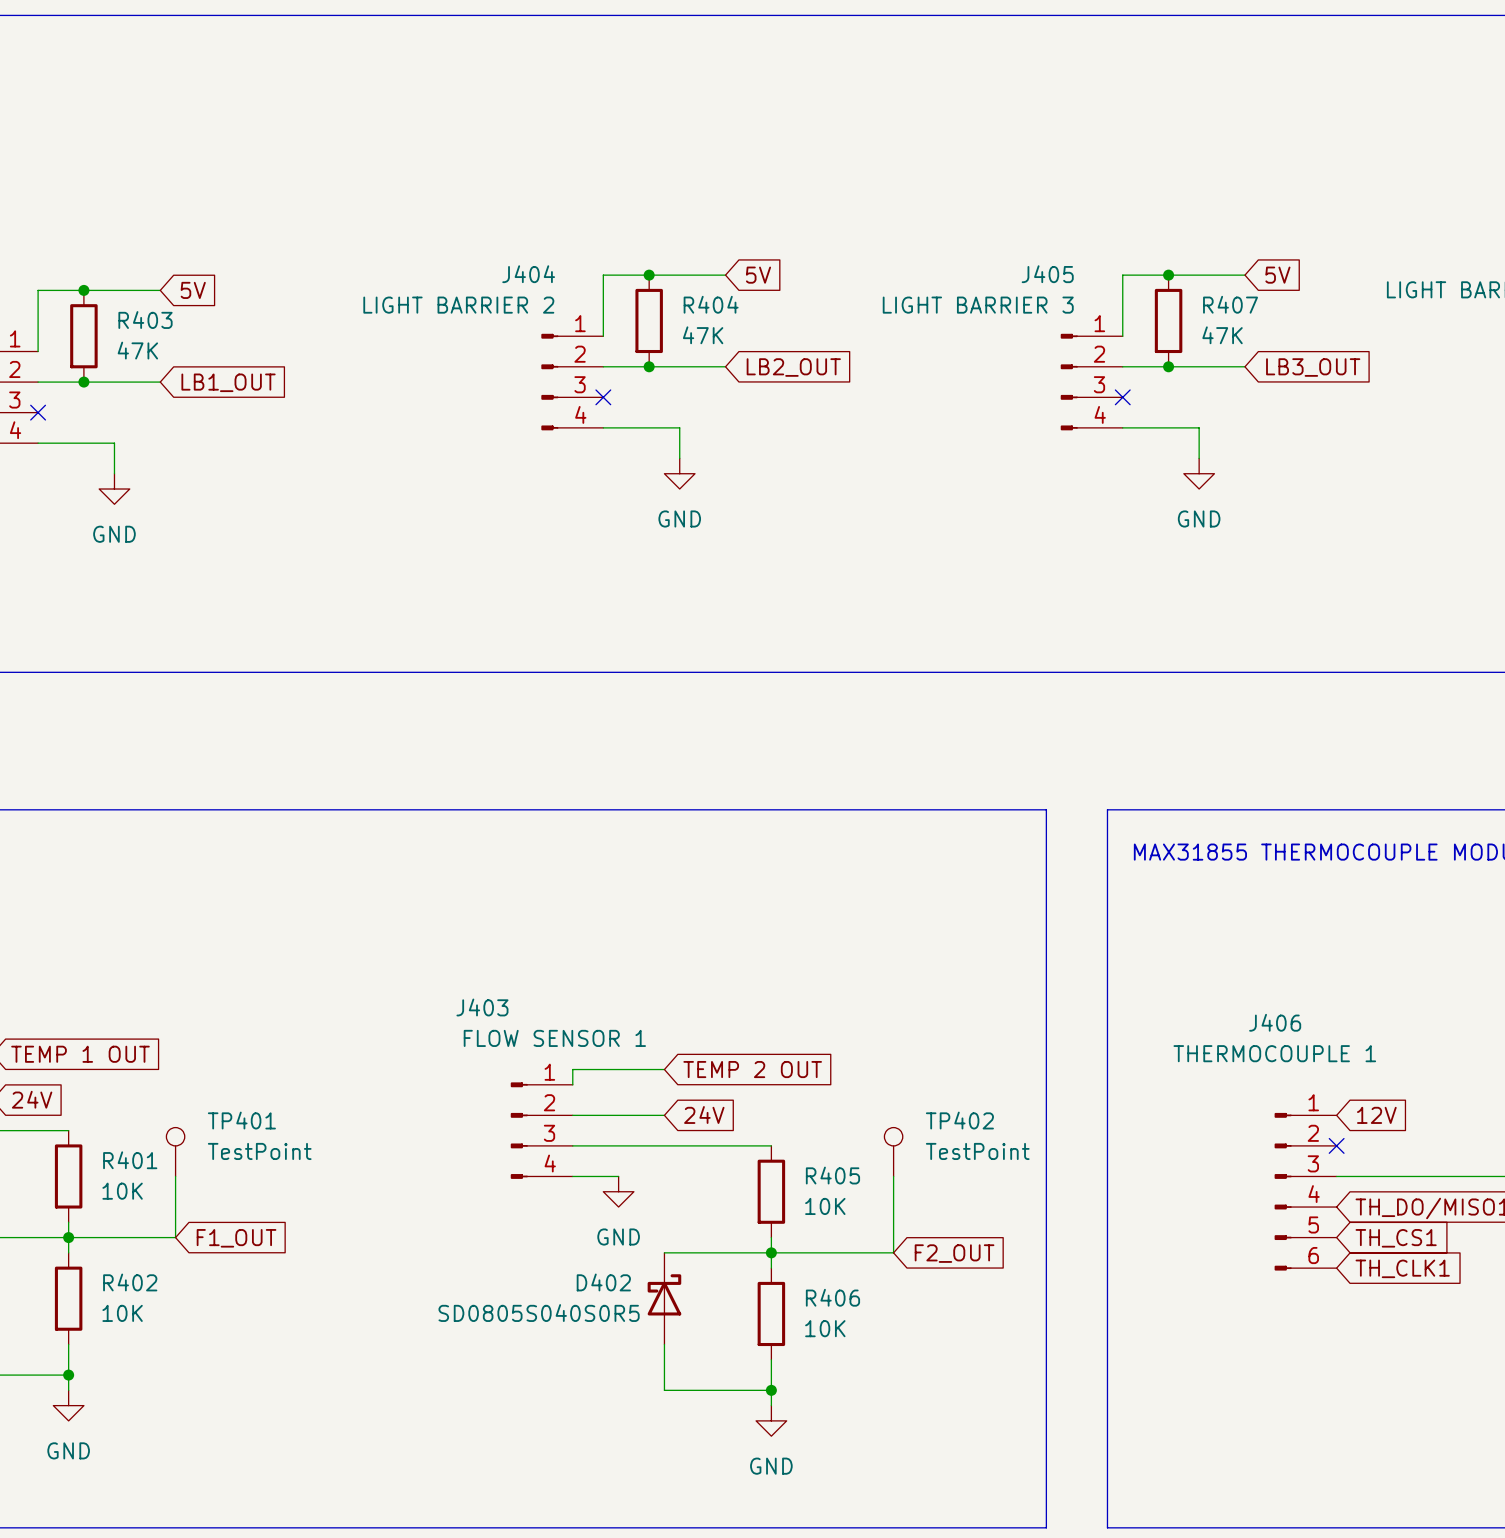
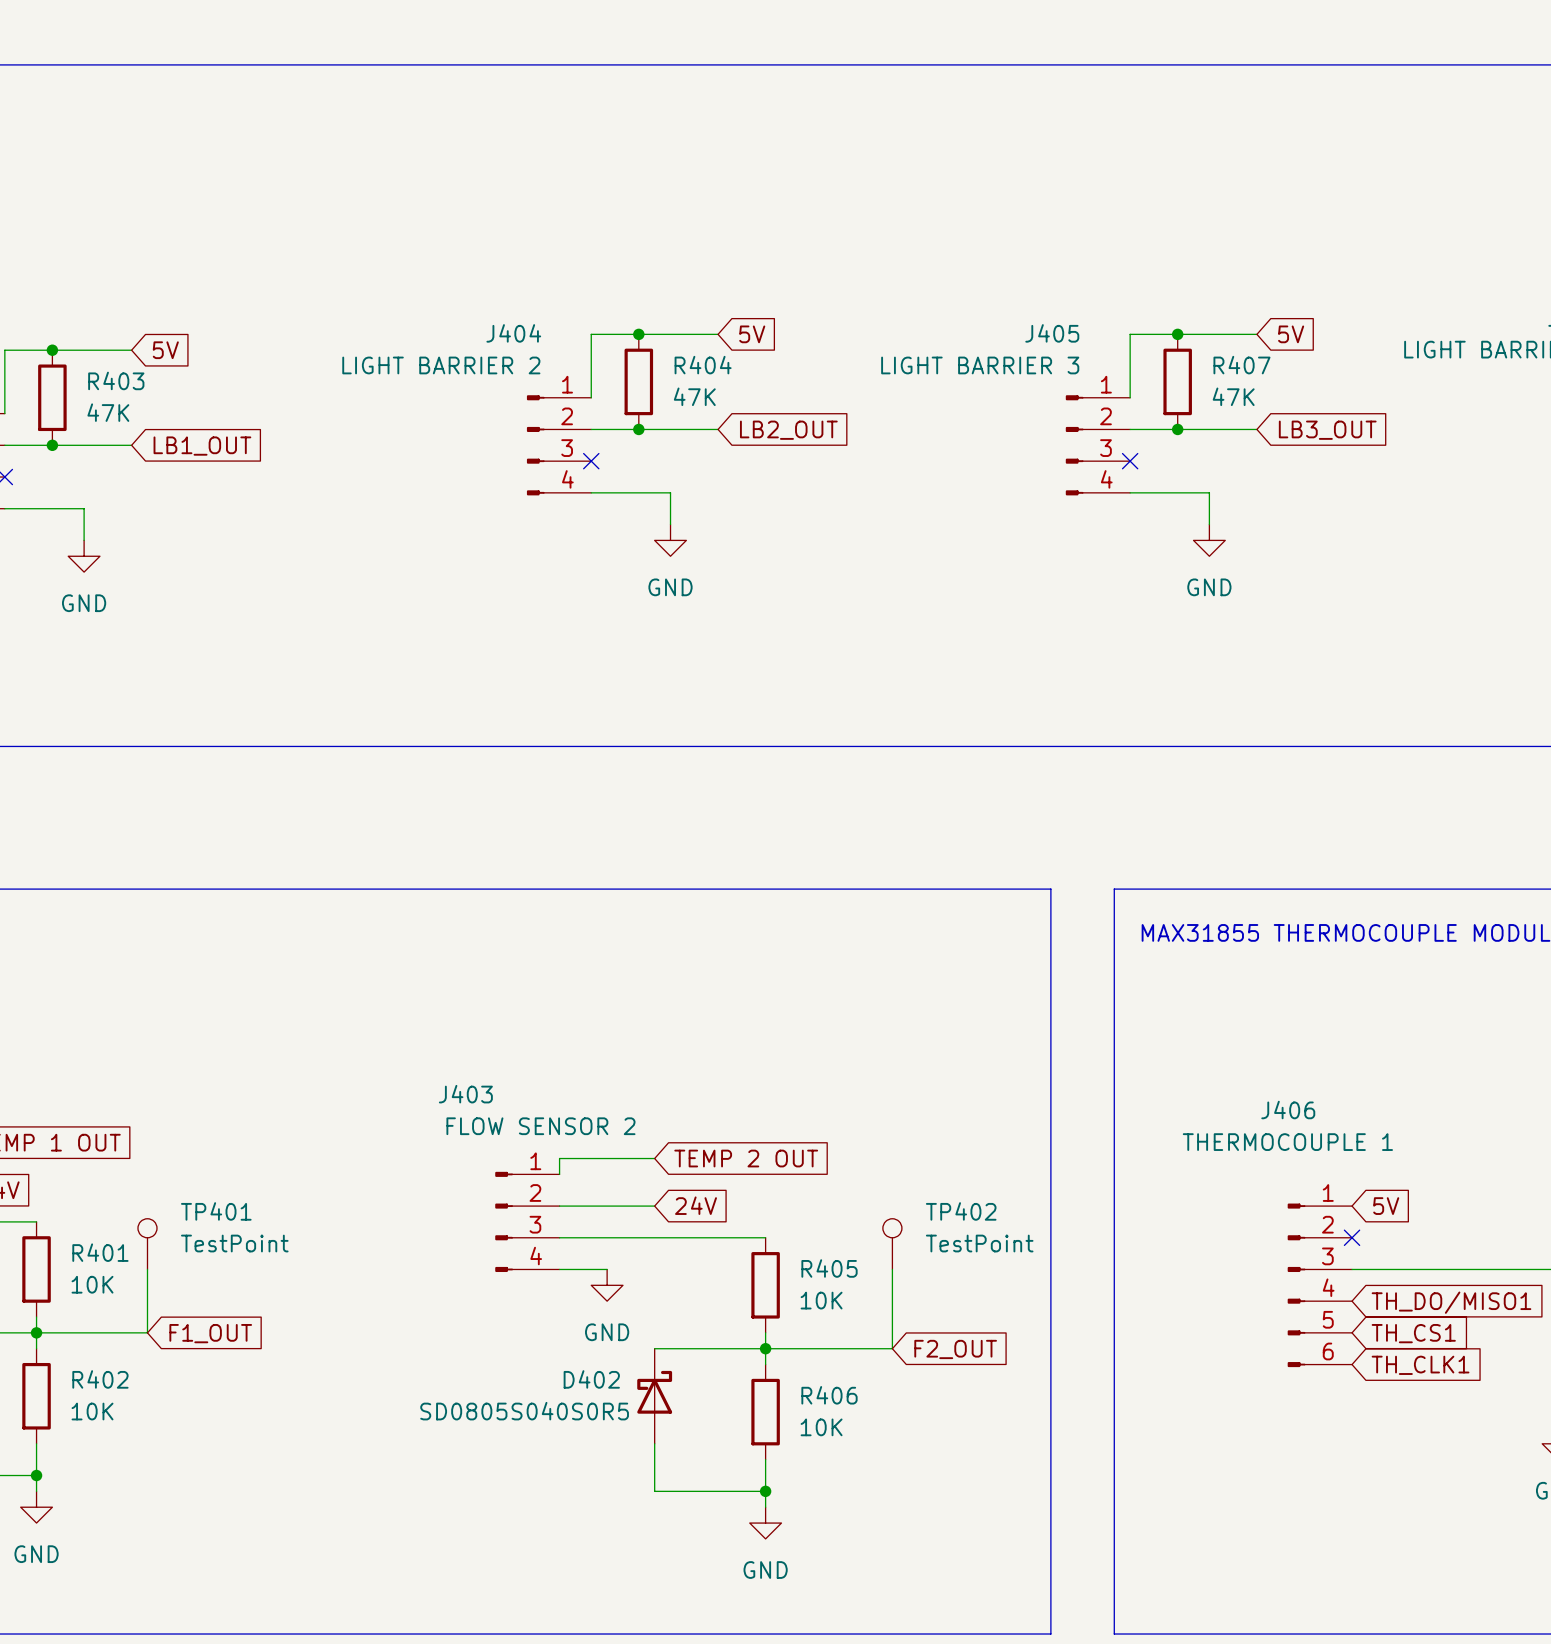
J403 value: FLOW SENSOR 1 (554, 1038) -> FLOW SENSOR 2 (540, 1126)
global label: 12V (1376, 1115) -> 5V (1386, 1206)

